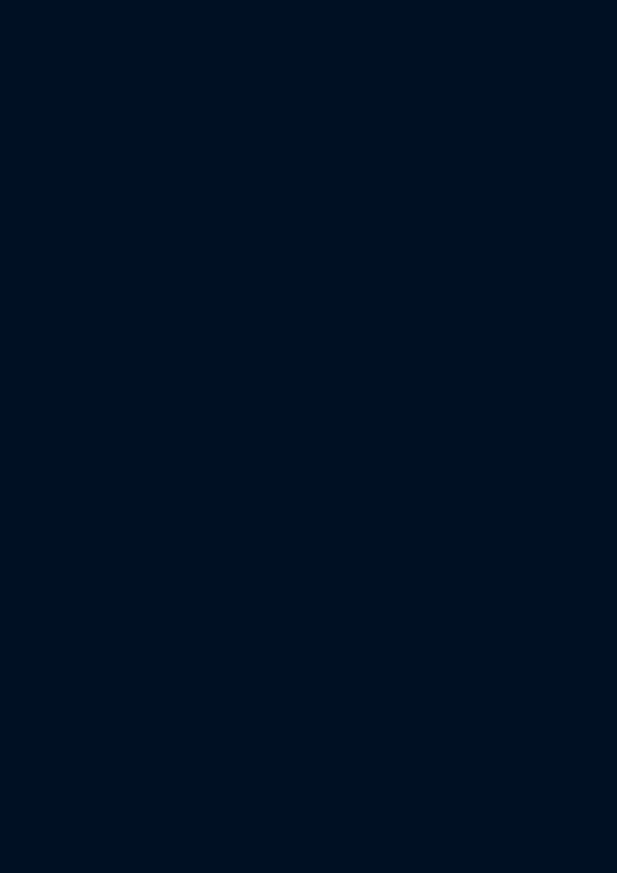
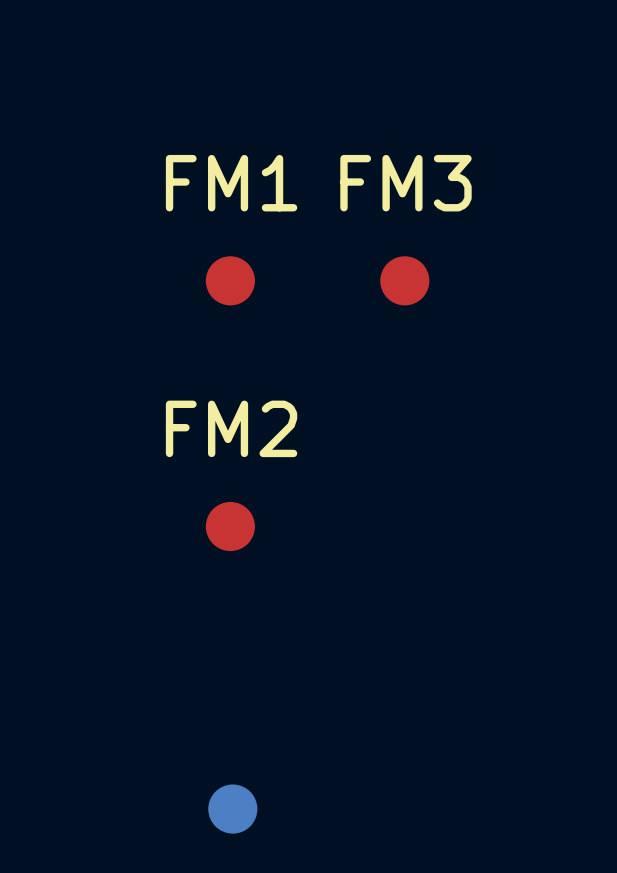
FM1: none -> (230, 280)
FM3: none -> (404, 280)
FM2: none -> (230, 526)
part: none -> (232, 809)

